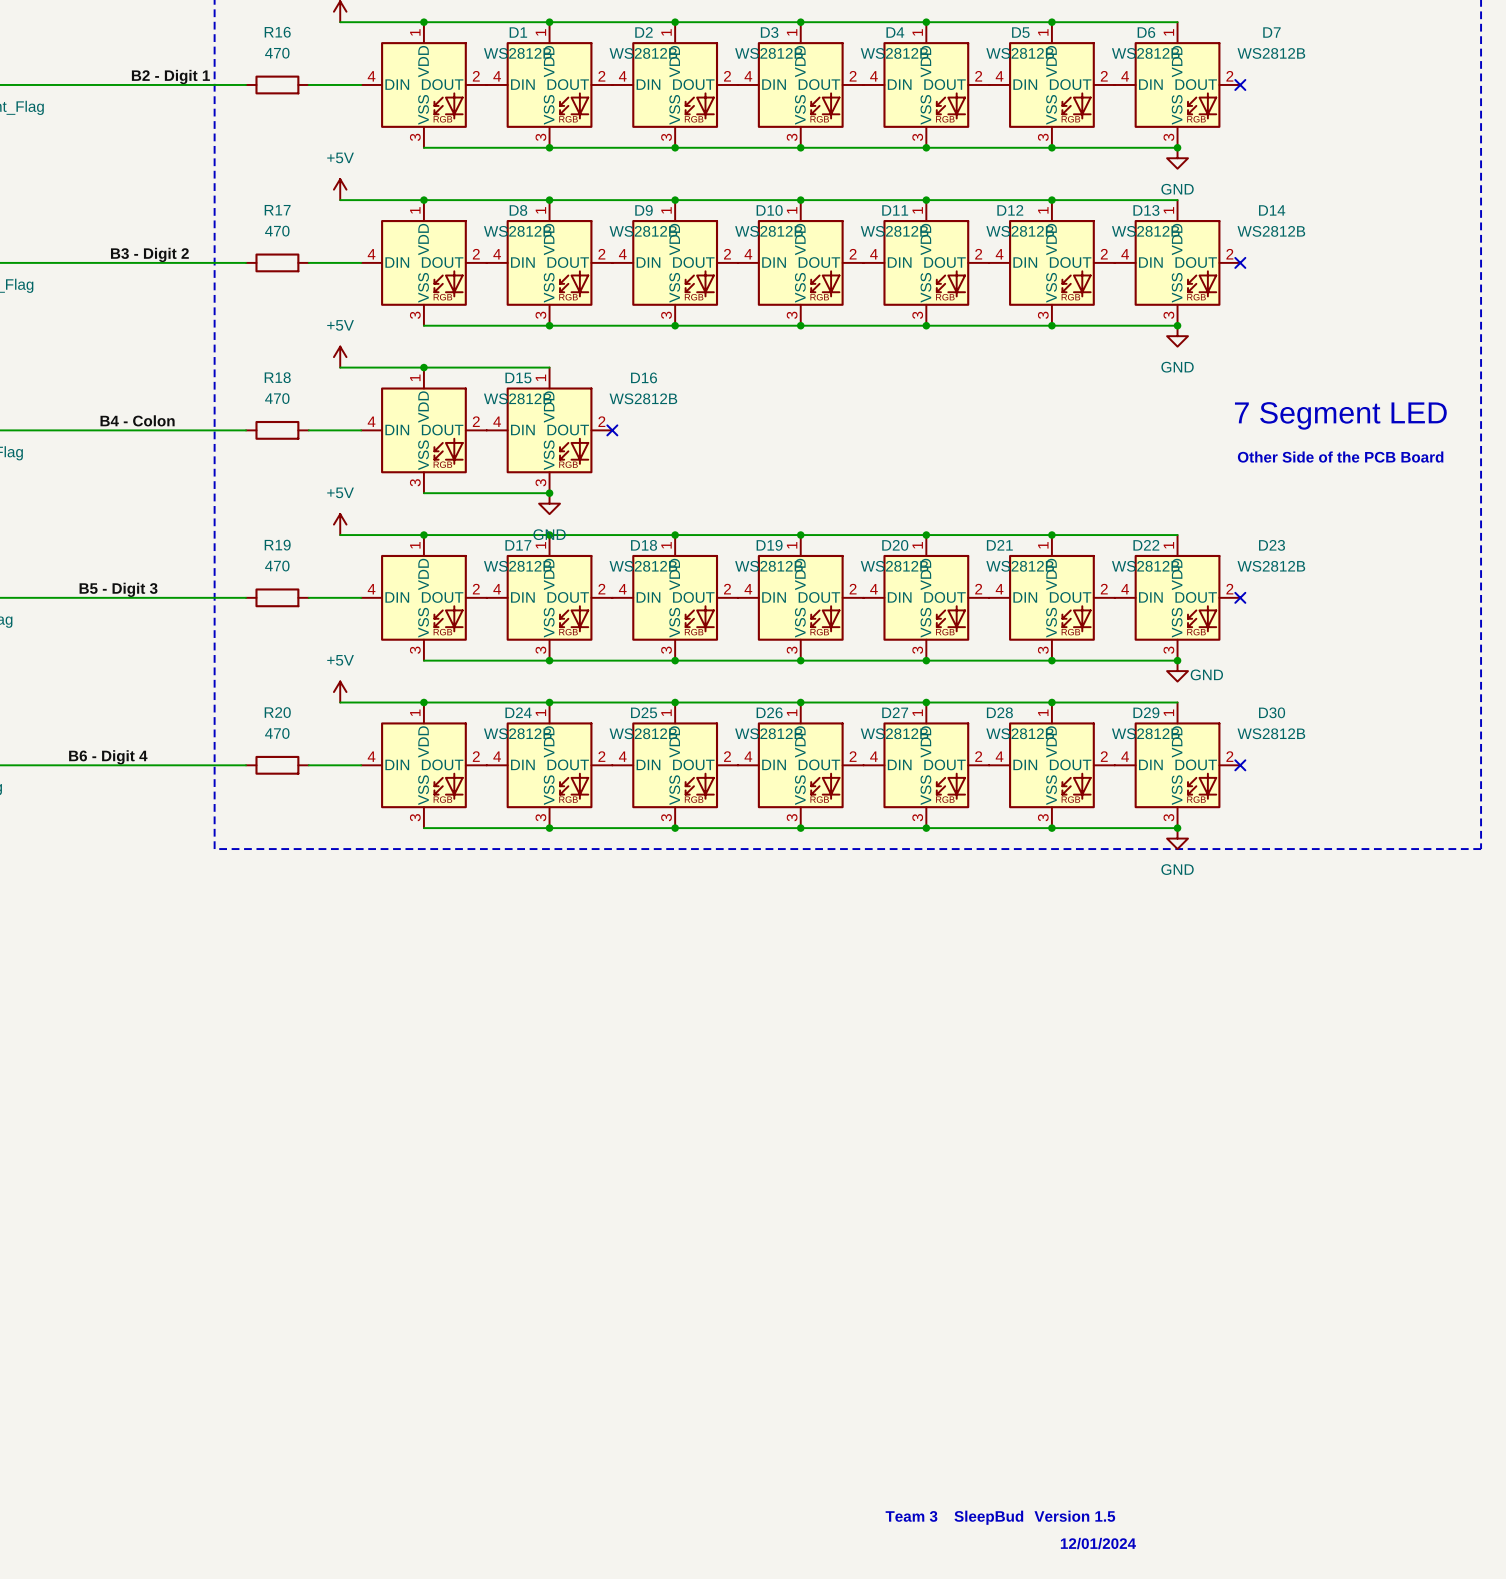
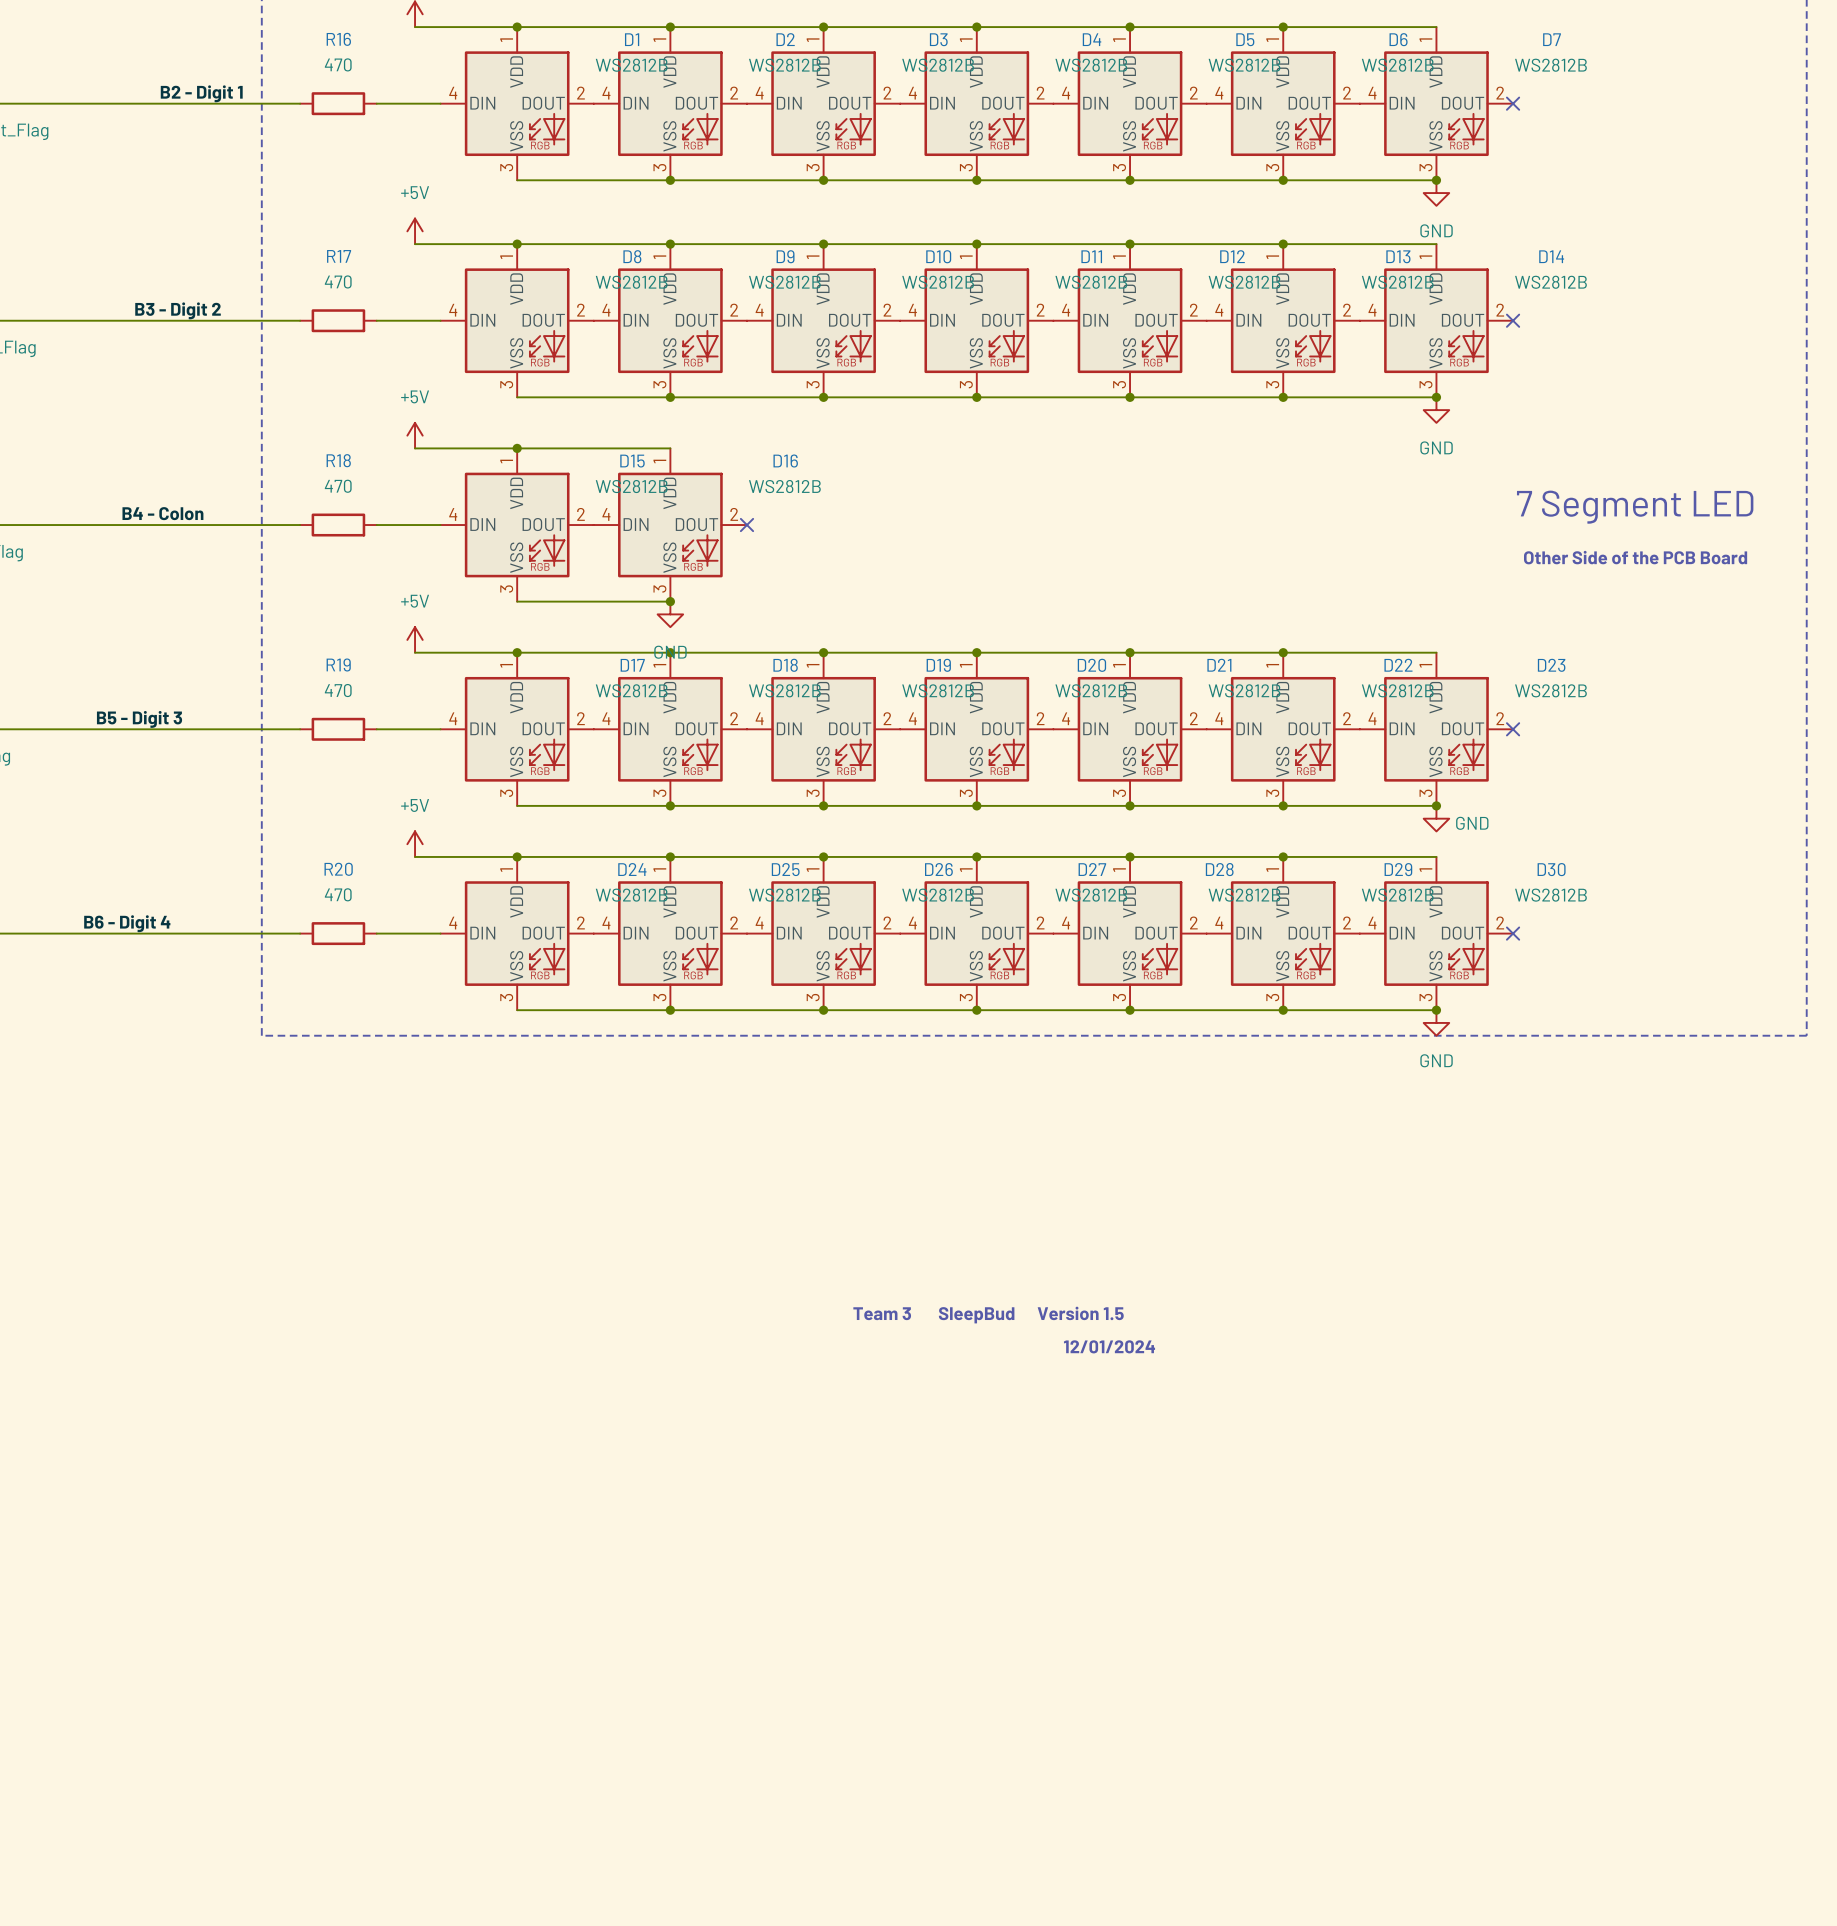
text: none -> Team 3 (882, 1313)
text: none -> Version 1.5 (1080, 1313)
text: none -> SleepBud (976, 1315)
text: none -> 12/01/2024 (1109, 1346)
text: Team 3 (911, 1516) -> none
text: Version 1.5 (1074, 1516) -> none
text: SleepBud (988, 1517) -> none
text: 12/01/2024 (1098, 1543) -> none

